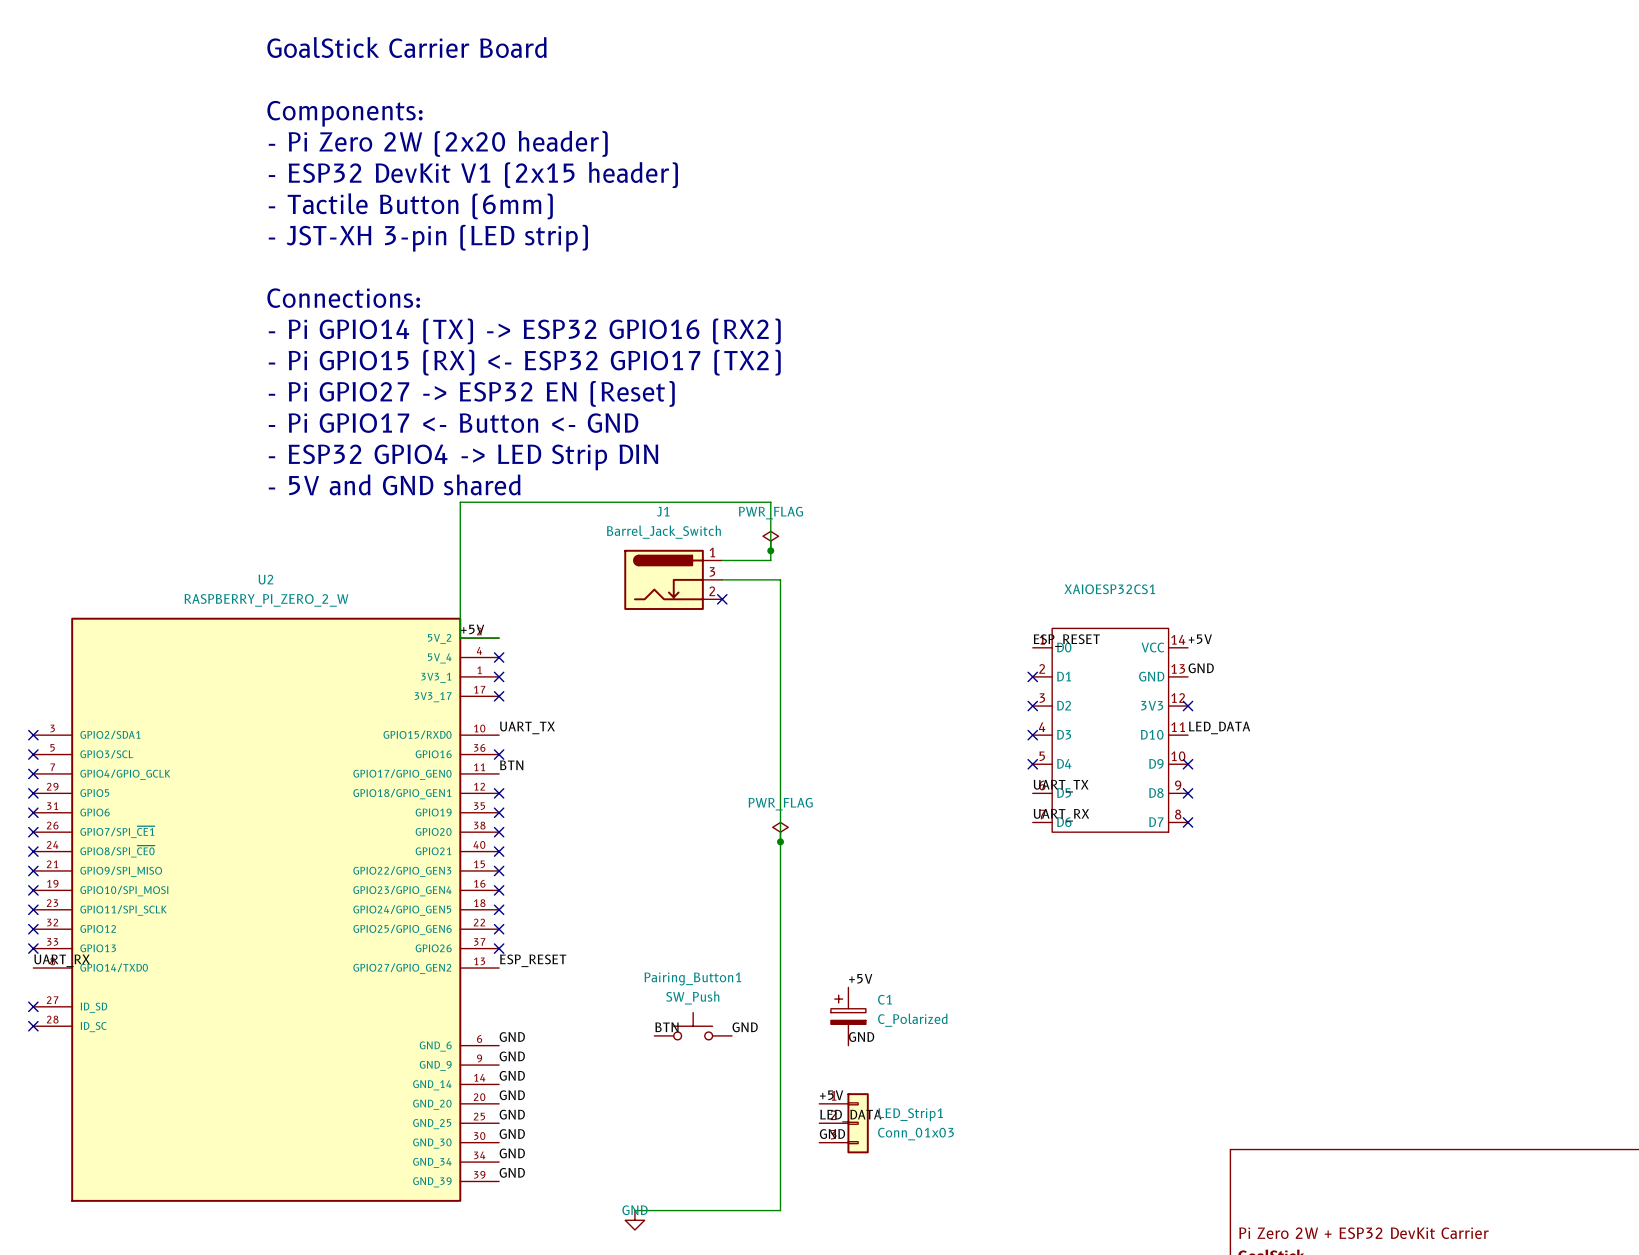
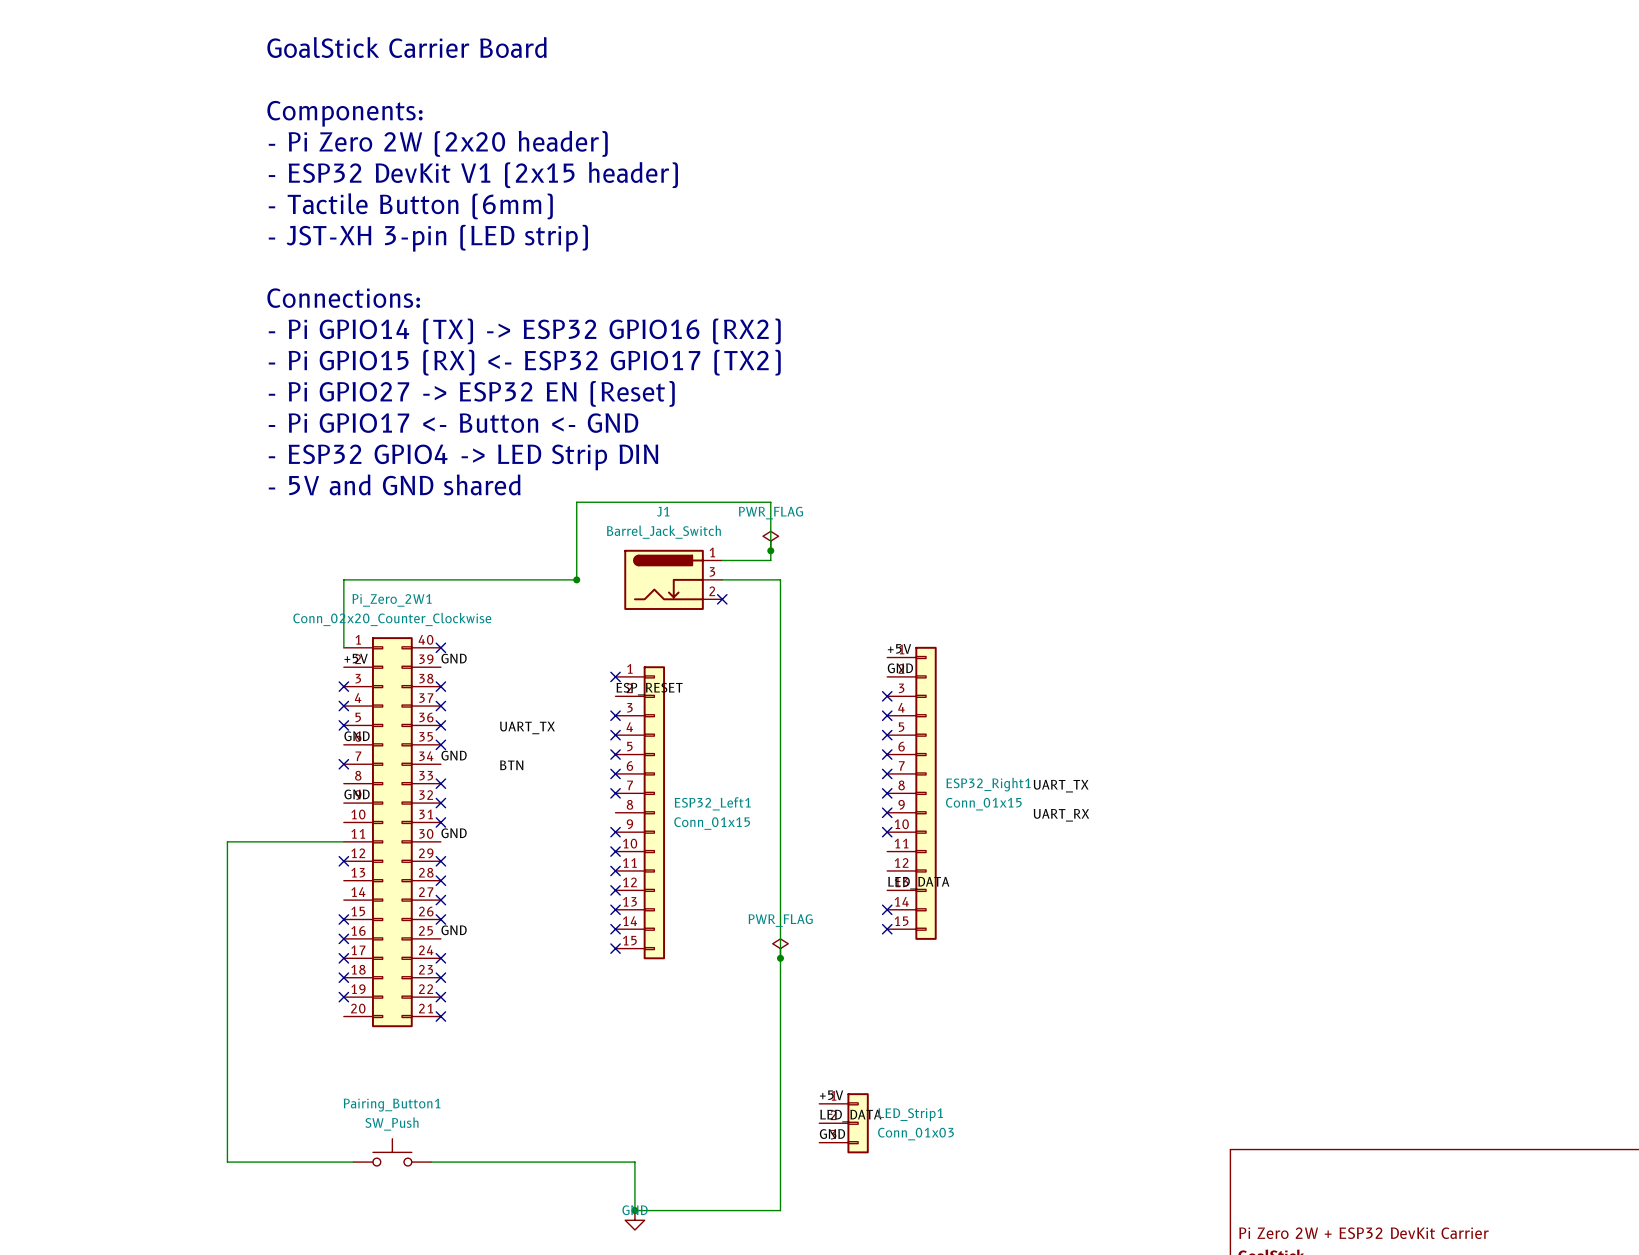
wire: (576, 502) (460, 502) (460, 638) (499, 638) -> (576, 502) (576, 579) (343, 579) (343, 647)
junction: none -> (576, 579)
label position: +5V (472, 629) -> +5V (356, 658)
label: +5V (1200, 639) -> none
label: ESP_RESET (1066, 640) -> none
no-connect mark: none -> (440, 647)
label: none -> +5V (899, 648)
no-connect mark: (499, 657) -> none
label: none -> GND (454, 658)
label: none -> GND (900, 668)
label: GND (1201, 668) -> none
no-connect mark: (499, 676) -> none
no-connect mark: none -> (615, 676)
no-connect mark: (1032, 676) -> none
no-connect mark: none -> (343, 686)
no-connect mark: none -> (440, 686)
label: none -> ESP_RESET (649, 689)
no-connect mark: (499, 696) -> none
no-connect mark: none -> (887, 696)
no-connect mark: none -> (343, 706)
no-connect mark: none -> (440, 706)
no-connect mark: (1032, 706) -> none
no-connect mark: (1188, 706) -> none
no-connect mark: none -> (615, 715)
no-connect mark: none -> (887, 715)
no-connect mark: none -> (343, 725)
no-connect mark: none -> (440, 725)
label: LED_DATA (1219, 727) -> none
XAIOESP32CS1: (1110, 730) -> none
no-connect mark: (33, 735) -> none
no-connect mark: none -> (615, 735)
no-connect mark: none -> (887, 735)
no-connect mark: (1032, 735) -> none
label: none -> GND (357, 736)
no-connect mark: none -> (440, 744)
no-connect mark: (33, 754) -> none
no-connect mark: (499, 754) -> none
no-connect mark: none -> (615, 754)
no-connect mark: none -> (887, 754)
label: none -> GND (454, 755)
no-connect mark: none -> (343, 764)
no-connect mark: (1032, 764) -> none
no-connect mark: (1188, 764) -> none
no-connect mark: (33, 773) -> none
no-connect mark: none -> (615, 773)
no-connect mark: none -> (887, 773)
no-connect mark: none -> (440, 783)
no-connect mark: (33, 793) -> none
no-connect mark: (499, 793) -> none
no-connect mark: none -> (615, 793)
no-connect mark: none -> (887, 793)
ESP32_Right1: none -> Conn_01x15 (911, 793)
no-connect mark: (1188, 793) -> none
label: none -> GND (357, 794)
no-connect mark: none -> (440, 803)
no-connect mark: (33, 812) -> none
no-connect mark: (499, 812) -> none
ESP32_Left1: none -> Conn_01x15 (640, 812)
no-connect mark: none -> (887, 812)
no-connect mark: none -> (440, 822)
no-connect mark: (1188, 822) -> none
no-connect mark: (33, 832) -> none
Pi_Zero_2W1: none -> Conn_02x20_Counter_Clockwise (392, 832)
no-connect mark: (499, 832) -> none
no-connect mark: none -> (615, 832)
power symbol position: PWR_FLAG (780, 832) -> PWR_FLAG (780, 948)
no-connect mark: none -> (887, 832)
label: none -> GND (454, 833)
junction: (780, 841) -> none
no-connect mark: (33, 851) -> none
no-connect mark: (499, 851) -> none
no-connect mark: none -> (615, 851)
no-connect mark: none -> (343, 861)
no-connect mark: none -> (440, 861)
no-connect mark: (33, 870) -> none
no-connect mark: (499, 870) -> none
no-connect mark: none -> (615, 870)
no-connect mark: none -> (440, 880)
label: none -> LED_DATA (918, 883)
no-connect mark: (33, 890) -> none
no-connect mark: (499, 890) -> none
no-connect mark: none -> (615, 890)
no-connect mark: none -> (440, 900)
no-connect mark: (33, 909) -> none
U2: RASPBERRY_PI_ZERO_2_W (266, 909) -> none
no-connect mark: (499, 909) -> none
no-connect mark: none -> (615, 909)
no-connect mark: none -> (887, 909)
no-connect mark: none -> (343, 919)
no-connect mark: none -> (440, 919)
no-connect mark: (33, 929) -> none
no-connect mark: (499, 929) -> none
no-connect mark: none -> (615, 929)
no-connect mark: none -> (887, 929)
label: none -> GND (454, 930)
no-connect mark: none -> (343, 938)
no-connect mark: (33, 948) -> none
no-connect mark: (499, 948) -> none
no-connect mark: none -> (615, 948)
no-connect mark: none -> (343, 958)
no-connect mark: none -> (440, 958)
junction: none -> (780, 958)
label: UART_RX (62, 960) -> none
label: ESP_RESET (533, 960) -> none
no-connect mark: none -> (343, 977)
no-connect mark: none -> (440, 977)
label: +5V (860, 978) -> none
no-connect mark: none -> (343, 997)
no-connect mark: none -> (440, 997)
no-connect mark: (33, 1006) -> none
no-connect mark: none -> (440, 1016)
C1: C_Polarized (848, 1016) -> none
no-connect mark: (33, 1026) -> none
Pairing_Button1 position: (693, 1026) -> (392, 1152)
label: BTN (666, 1027) -> none
label: GND (745, 1027) -> none
label: GND (512, 1037) -> none
label: GND (861, 1037) -> none
label: GND (512, 1056) -> none
label: GND (512, 1075) -> none
label: GND (512, 1095) -> none
label: GND (512, 1114) -> none
label: GND (512, 1134) -> none
label: GND (512, 1153) -> none
wire: none -> (431, 1162) (634, 1162) (634, 1210)
label: GND (512, 1172) -> none
junction: none -> (634, 1210)

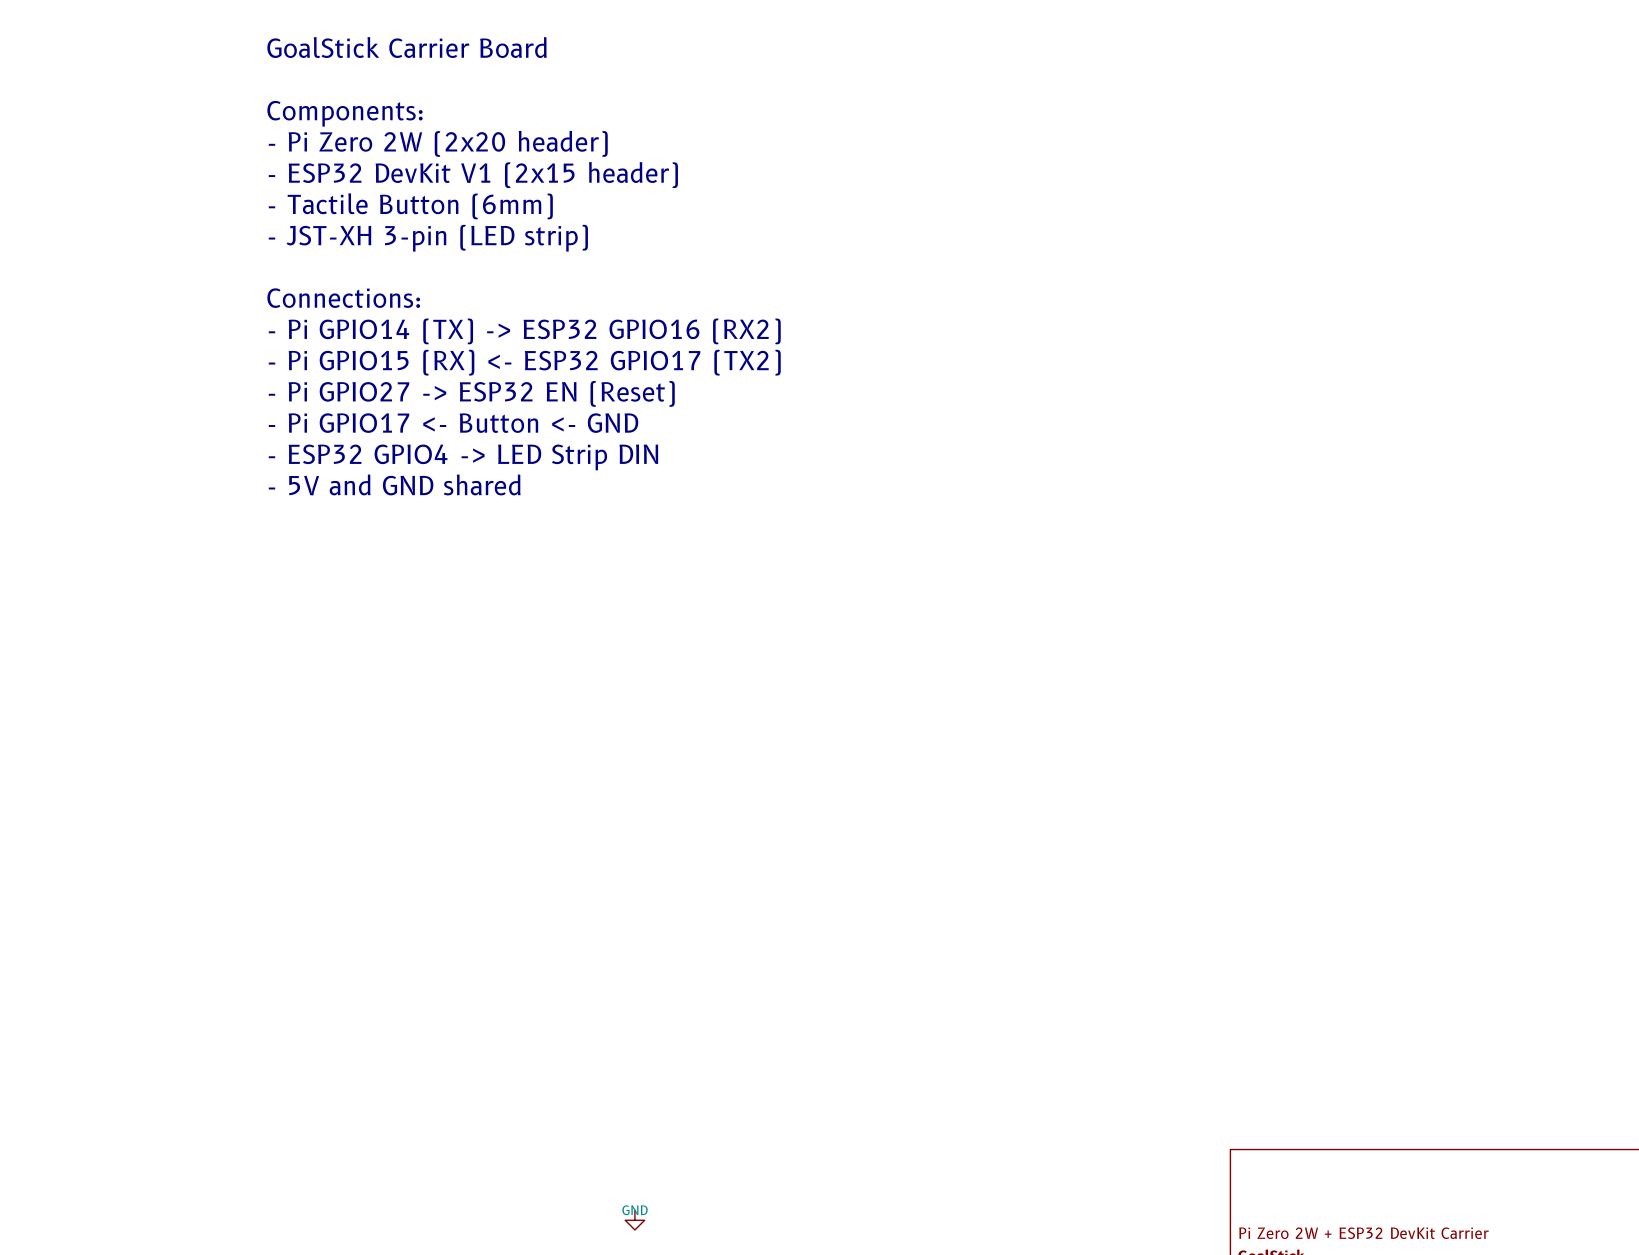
power symbol: PWR_FLAG (770, 541) -> none
junction: (770, 550) -> none
wire: (722, 560) (770, 560) (770, 502) (576, 502) (576, 579) (343, 579) (343, 647) -> none
junction: (576, 579) -> none
J1: Barrel_Jack_Switch (673, 579) -> none
wire: (722, 579) (780, 579) (780, 1210) (634, 1210) (634, 1162) (431, 1162) -> none
no-connect mark: (722, 599) -> none
no-connect mark: (440, 647) -> none
label: +5V (899, 648) -> none
label: +5V (356, 658) -> none
label: GND (454, 658) -> none
label: GND (900, 668) -> none
no-connect mark: (615, 676) -> none
no-connect mark: (343, 686) -> none
no-connect mark: (440, 686) -> none
label: ESP_RESET (649, 689) -> none
no-connect mark: (887, 696) -> none
no-connect mark: (343, 706) -> none
no-connect mark: (440, 706) -> none
no-connect mark: (615, 715) -> none
no-connect mark: (887, 715) -> none
no-connect mark: (343, 725) -> none
no-connect mark: (440, 725) -> none
label: UART_TX (527, 727) -> none
no-connect mark: (615, 735) -> none
no-connect mark: (887, 735) -> none
label: GND (357, 736) -> none
no-connect mark: (440, 744) -> none
no-connect mark: (615, 754) -> none
no-connect mark: (887, 754) -> none
label: GND (454, 755) -> none
no-connect mark: (343, 764) -> none
label: BTN (511, 765) -> none
no-connect mark: (615, 773) -> none
no-connect mark: (887, 773) -> none
no-connect mark: (440, 783) -> none
label: UART_TX (1061, 786) -> none
no-connect mark: (615, 793) -> none
no-connect mark: (887, 793) -> none
ESP32_Right1: Conn_01x15 (911, 793) -> none
label: GND (357, 794) -> none
no-connect mark: (440, 803) -> none
ESP32_Left1: Conn_01x15 (640, 812) -> none
no-connect mark: (887, 812) -> none
label: UART_RX (1061, 815) -> none
no-connect mark: (440, 822) -> none
Pi_Zero_2W1: Conn_02x20_Counter_Clockwise (392, 832) -> none
no-connect mark: (615, 832) -> none
no-connect mark: (887, 832) -> none
label: GND (454, 833) -> none
wire: (343, 841) (227, 841) (227, 1162) (353, 1162) -> none
no-connect mark: (615, 851) -> none
no-connect mark: (343, 861) -> none
no-connect mark: (440, 861) -> none
no-connect mark: (615, 870) -> none
no-connect mark: (440, 880) -> none
label: LED_DATA (918, 883) -> none
no-connect mark: (615, 890) -> none
no-connect mark: (440, 900) -> none
no-connect mark: (615, 909) -> none
no-connect mark: (887, 909) -> none
no-connect mark: (343, 919) -> none
no-connect mark: (440, 919) -> none
no-connect mark: (615, 929) -> none
no-connect mark: (887, 929) -> none
label: GND (454, 930) -> none
no-connect mark: (343, 938) -> none
no-connect mark: (615, 948) -> none
power symbol: PWR_FLAG (780, 948) -> none
no-connect mark: (343, 958) -> none
no-connect mark: (440, 958) -> none
junction: (780, 958) -> none
no-connect mark: (343, 977) -> none
no-connect mark: (440, 977) -> none
no-connect mark: (343, 997) -> none
no-connect mark: (440, 997) -> none
no-connect mark: (440, 1016) -> none
label: +5V (831, 1095) -> none
label: LED_DATA (850, 1116) -> none
LED_Strip1: Conn_01x03 (844, 1123) -> none
label: GND (832, 1134) -> none
Pairing_Button1: SW_Push (392, 1152) -> none
junction: (634, 1210) -> none

